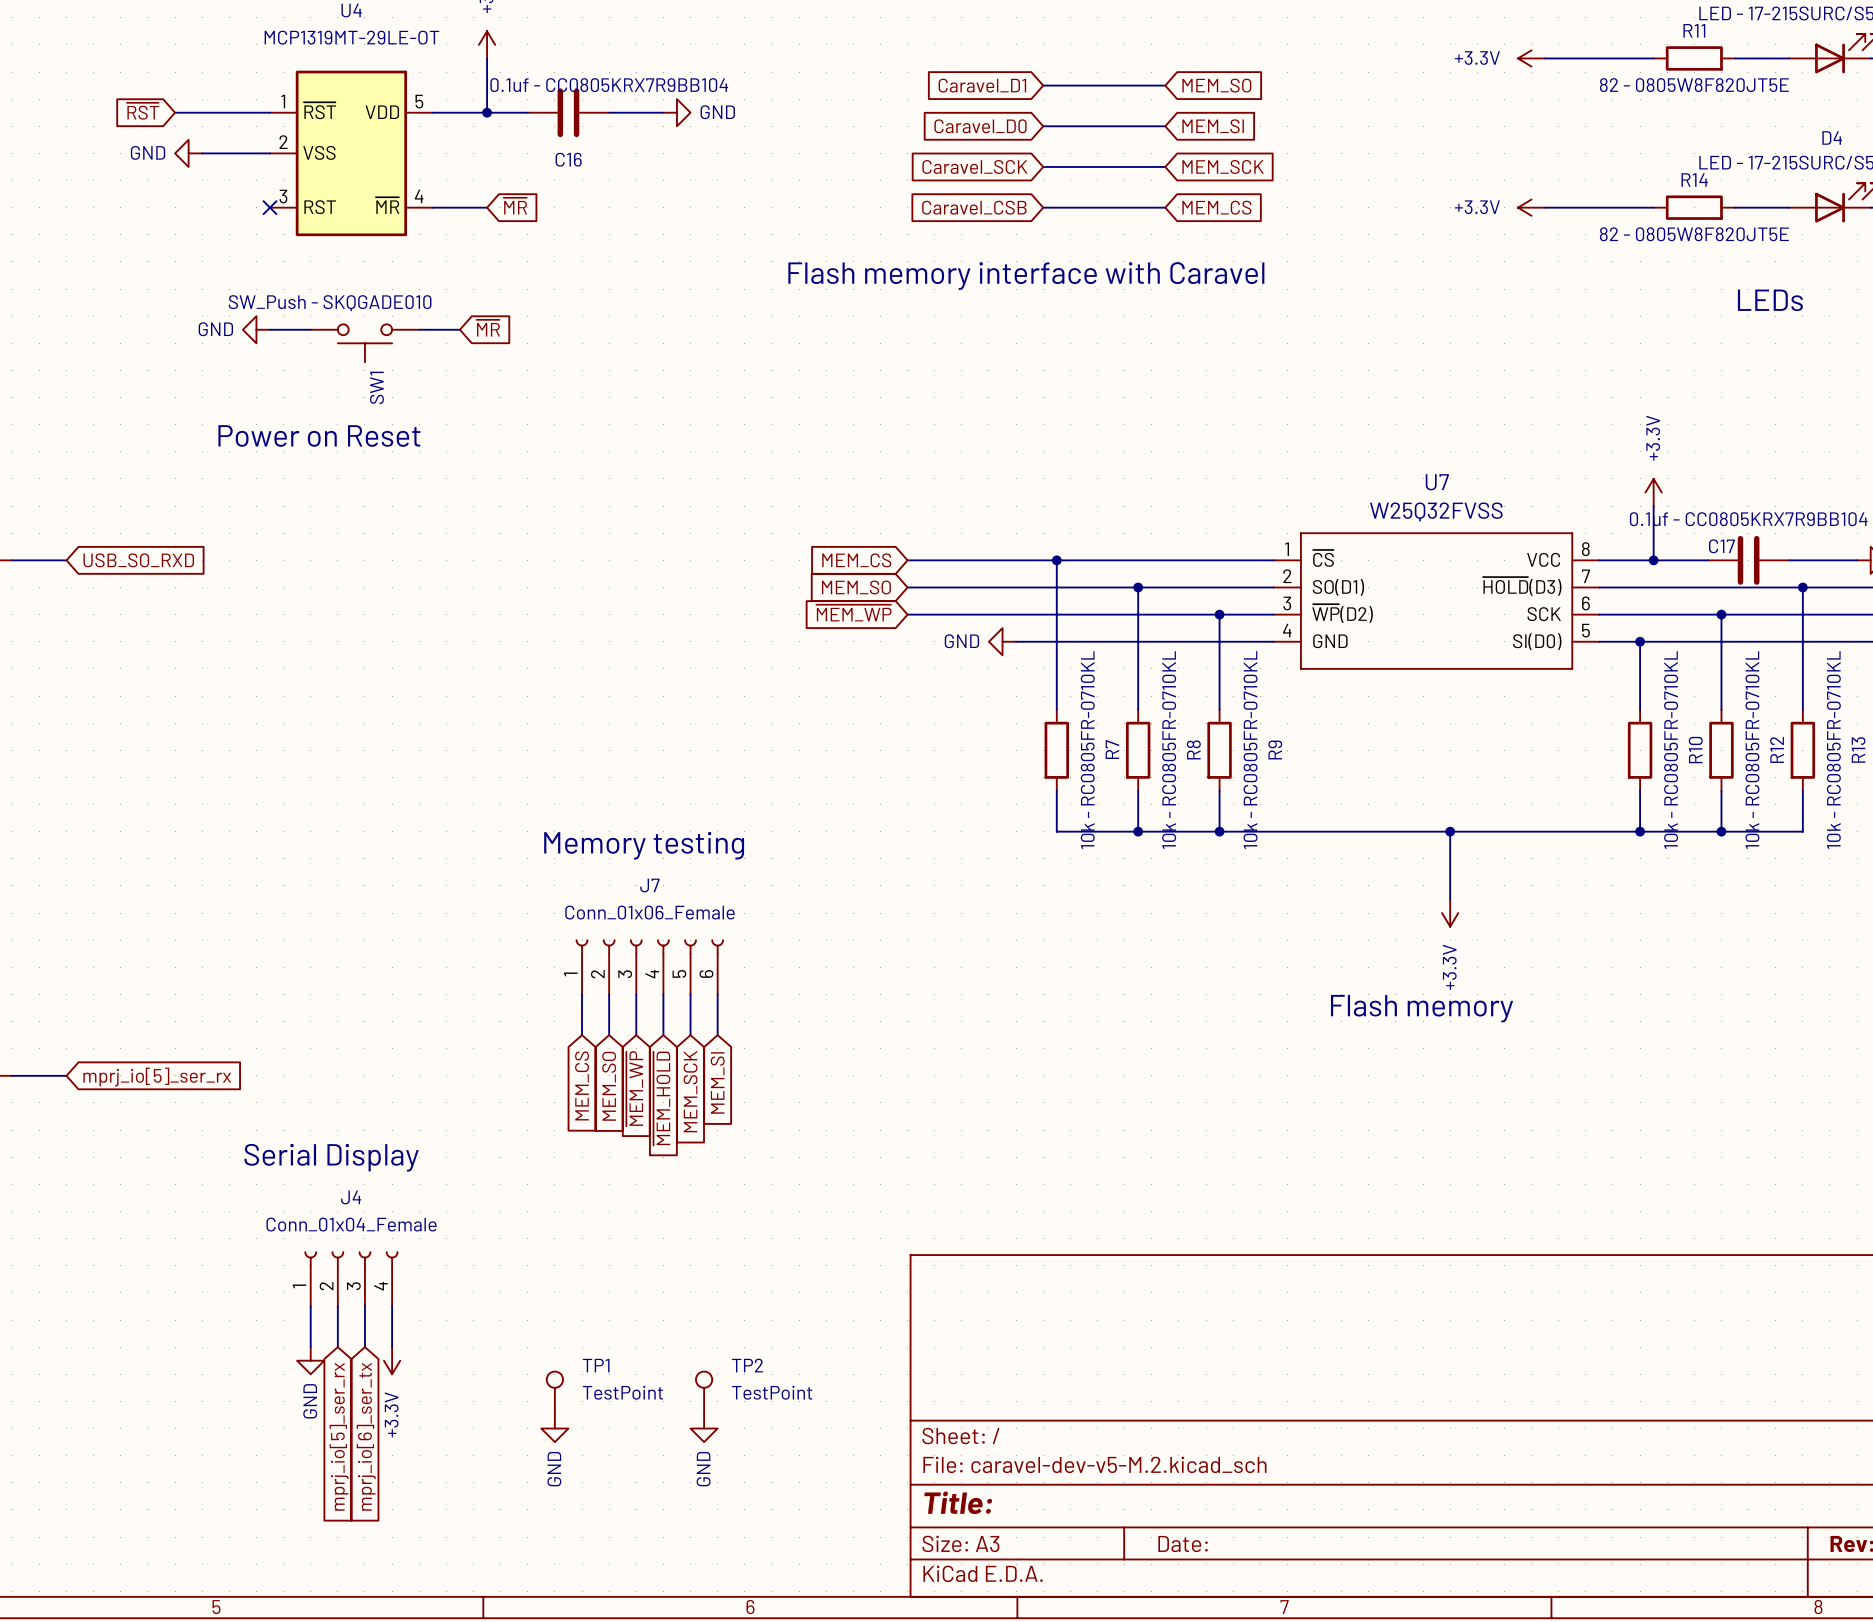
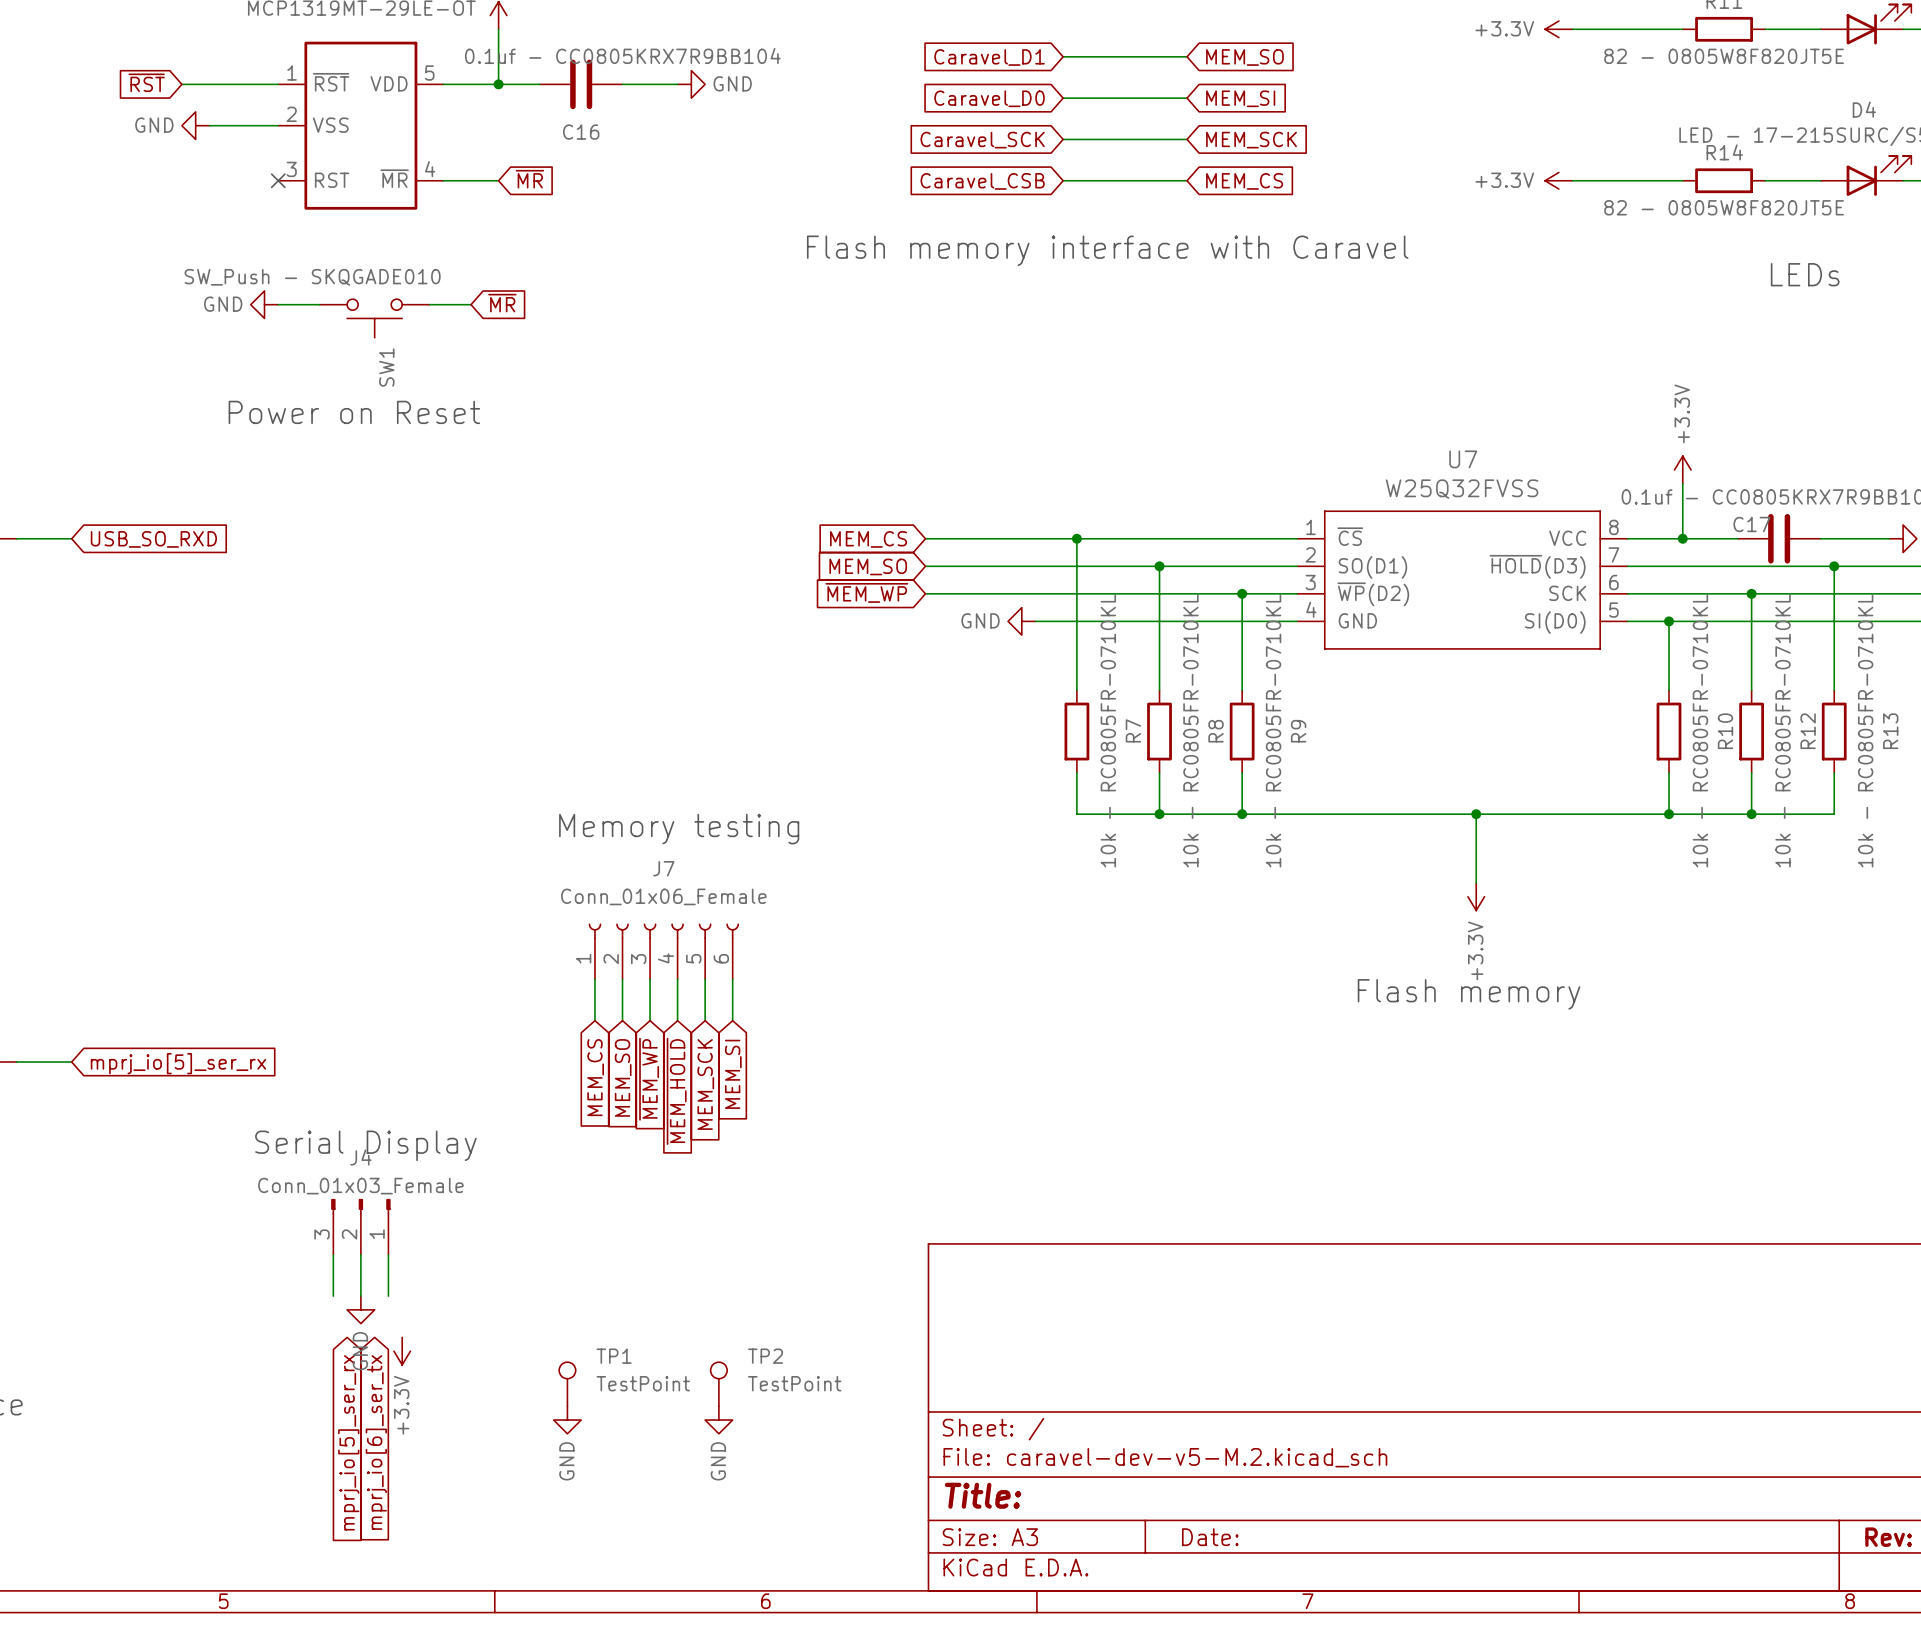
J4 value: Conn_01x04_Female (351, 1224) -> Conn_01x03_Female (360, 1186)
J4 symbol: [304, 1251, 399, 1307] -> [331, 1198, 391, 1255]
wire: (310, 1306) (310, 1347) -> none
wire: (337, 1306) (337, 1347) -> (333, 1254) (333, 1296)
wire: (364, 1306) (364, 1347) -> (360, 1254) (360, 1296)
wire: (392, 1306) (392, 1347) -> (388, 1254) (388, 1296)
power symbol position: GND (310, 1360) -> GND (360, 1309)

